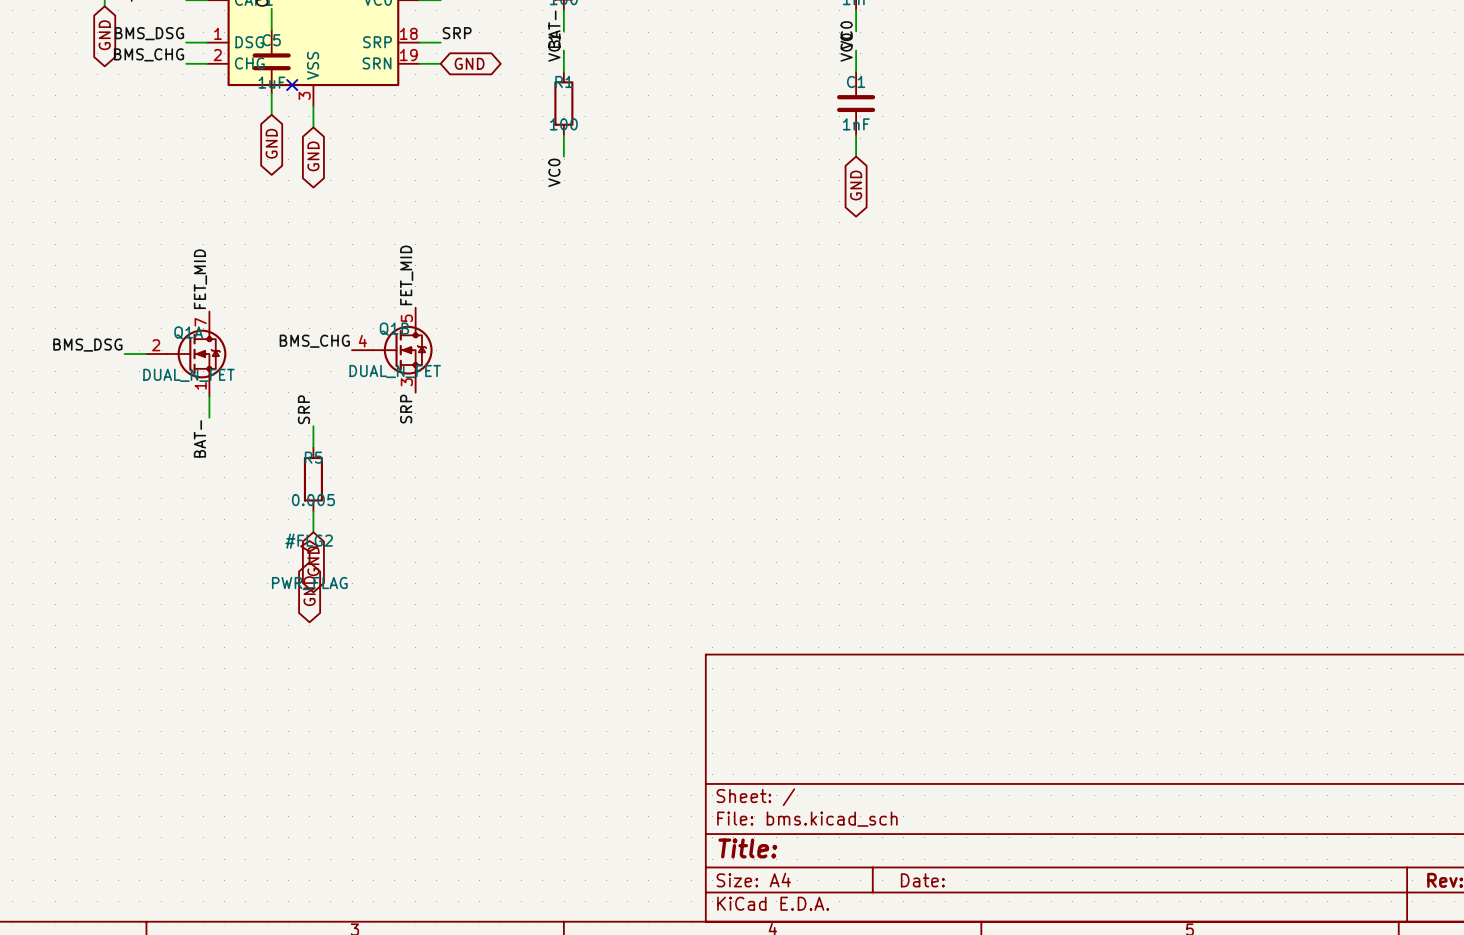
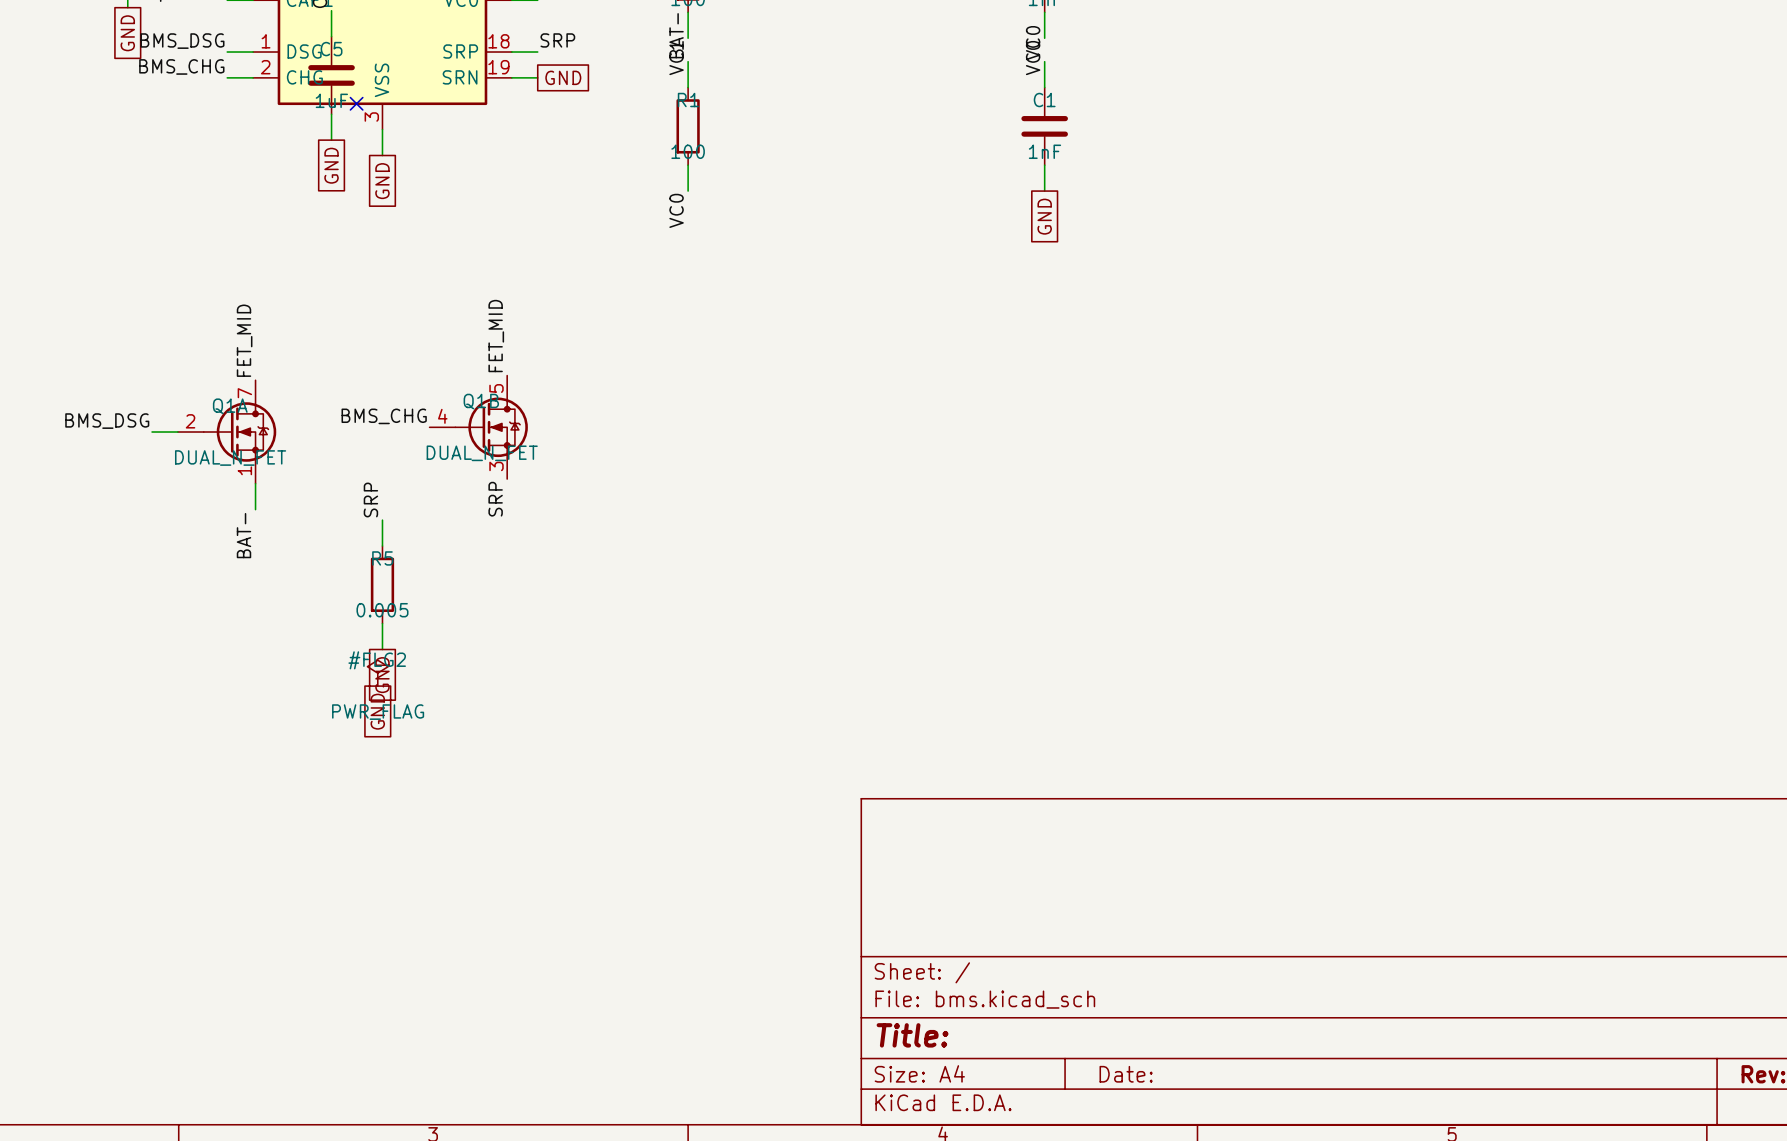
global label shape: bidirectional (104, 35) -> passive (127, 33)
global label shape: bidirectional (469, 63) -> passive (563, 77)
global label shape: bidirectional (271, 143) -> passive (331, 165)
global label shape: bidirectional (313, 156) -> passive (382, 181)
global label shape: bidirectional (856, 185) -> passive (1044, 216)
global label shape: bidirectional (313, 561) -> passive (382, 675)
global label shape: bidirectional (309, 591) -> passive (377, 711)

